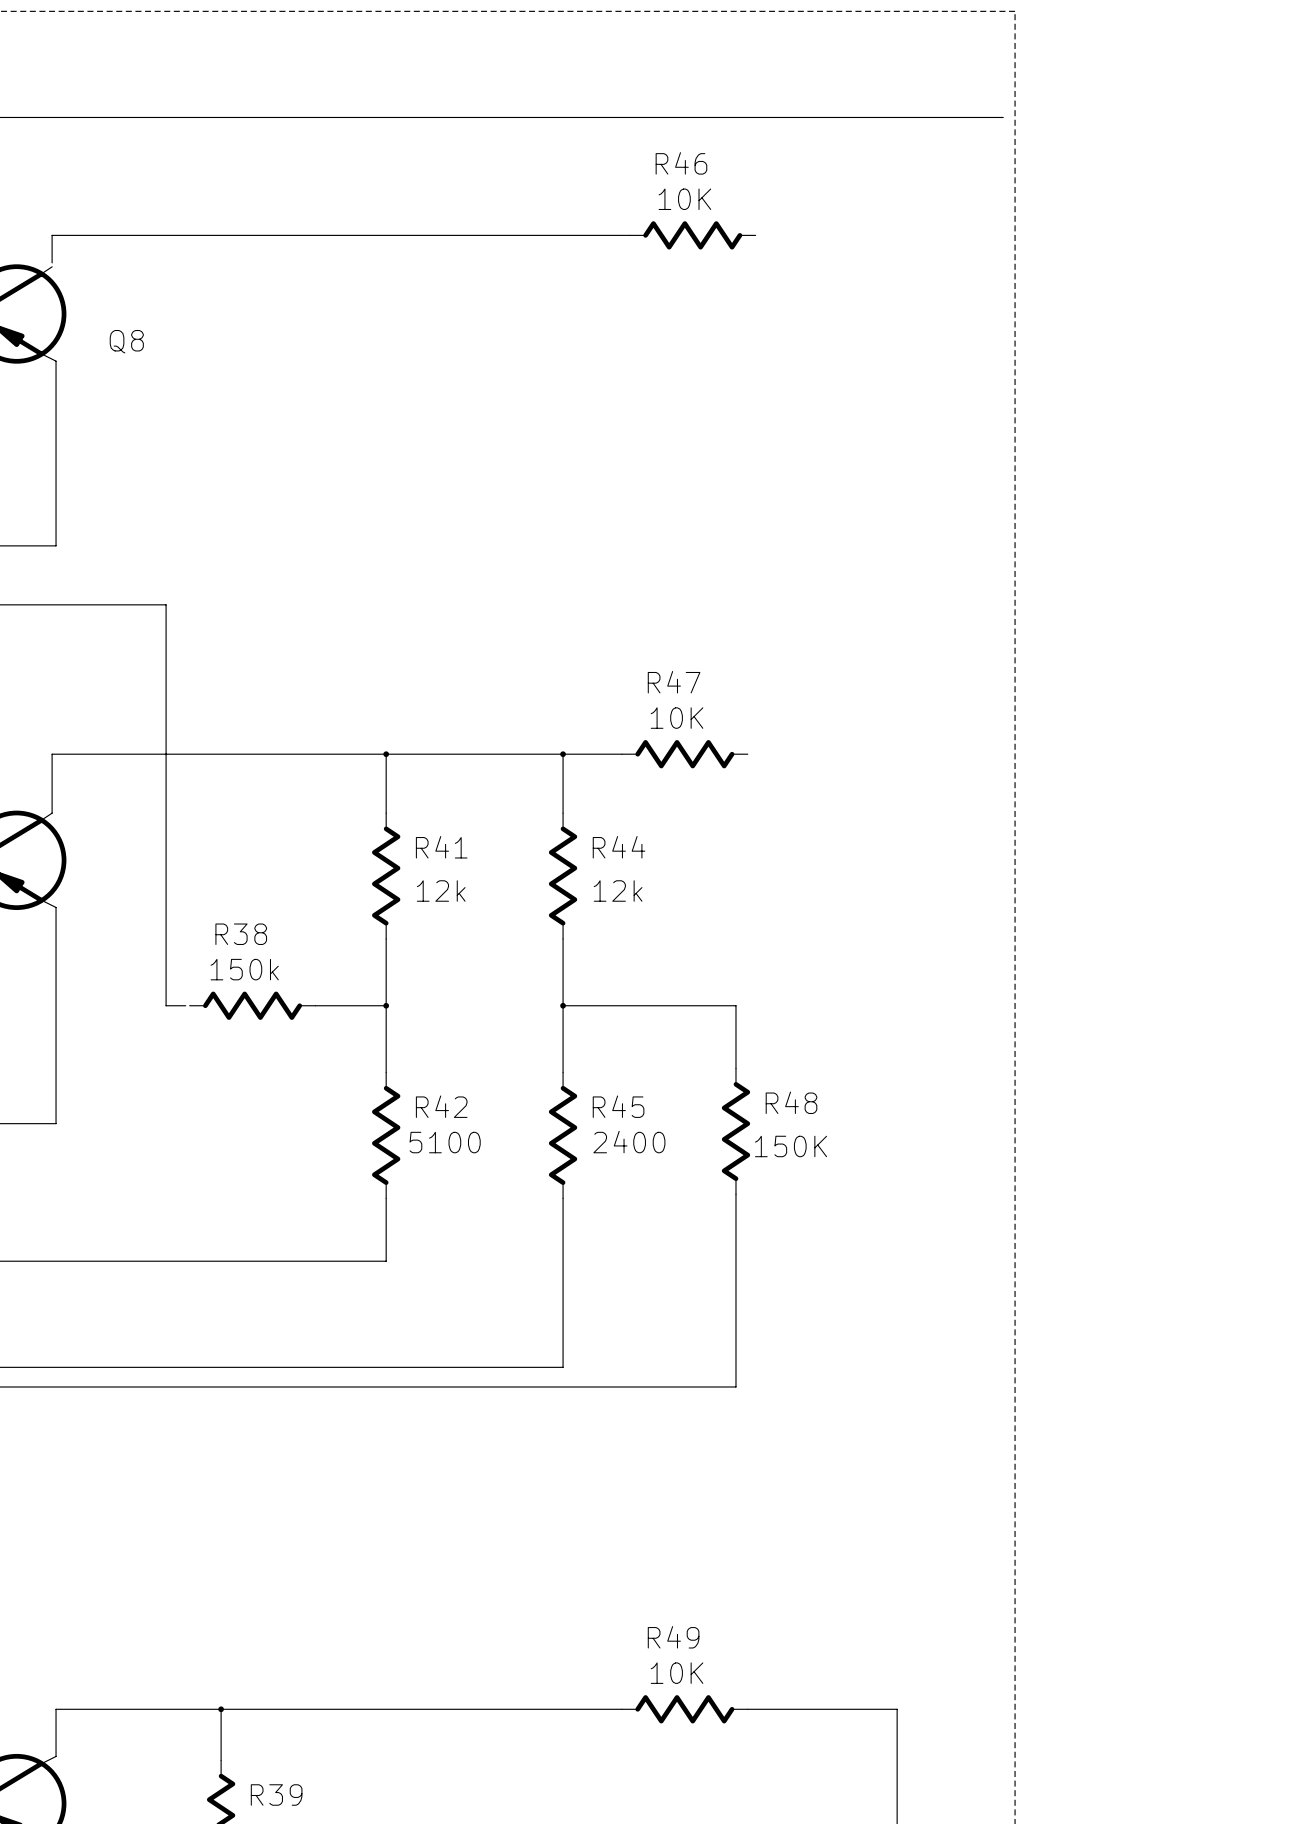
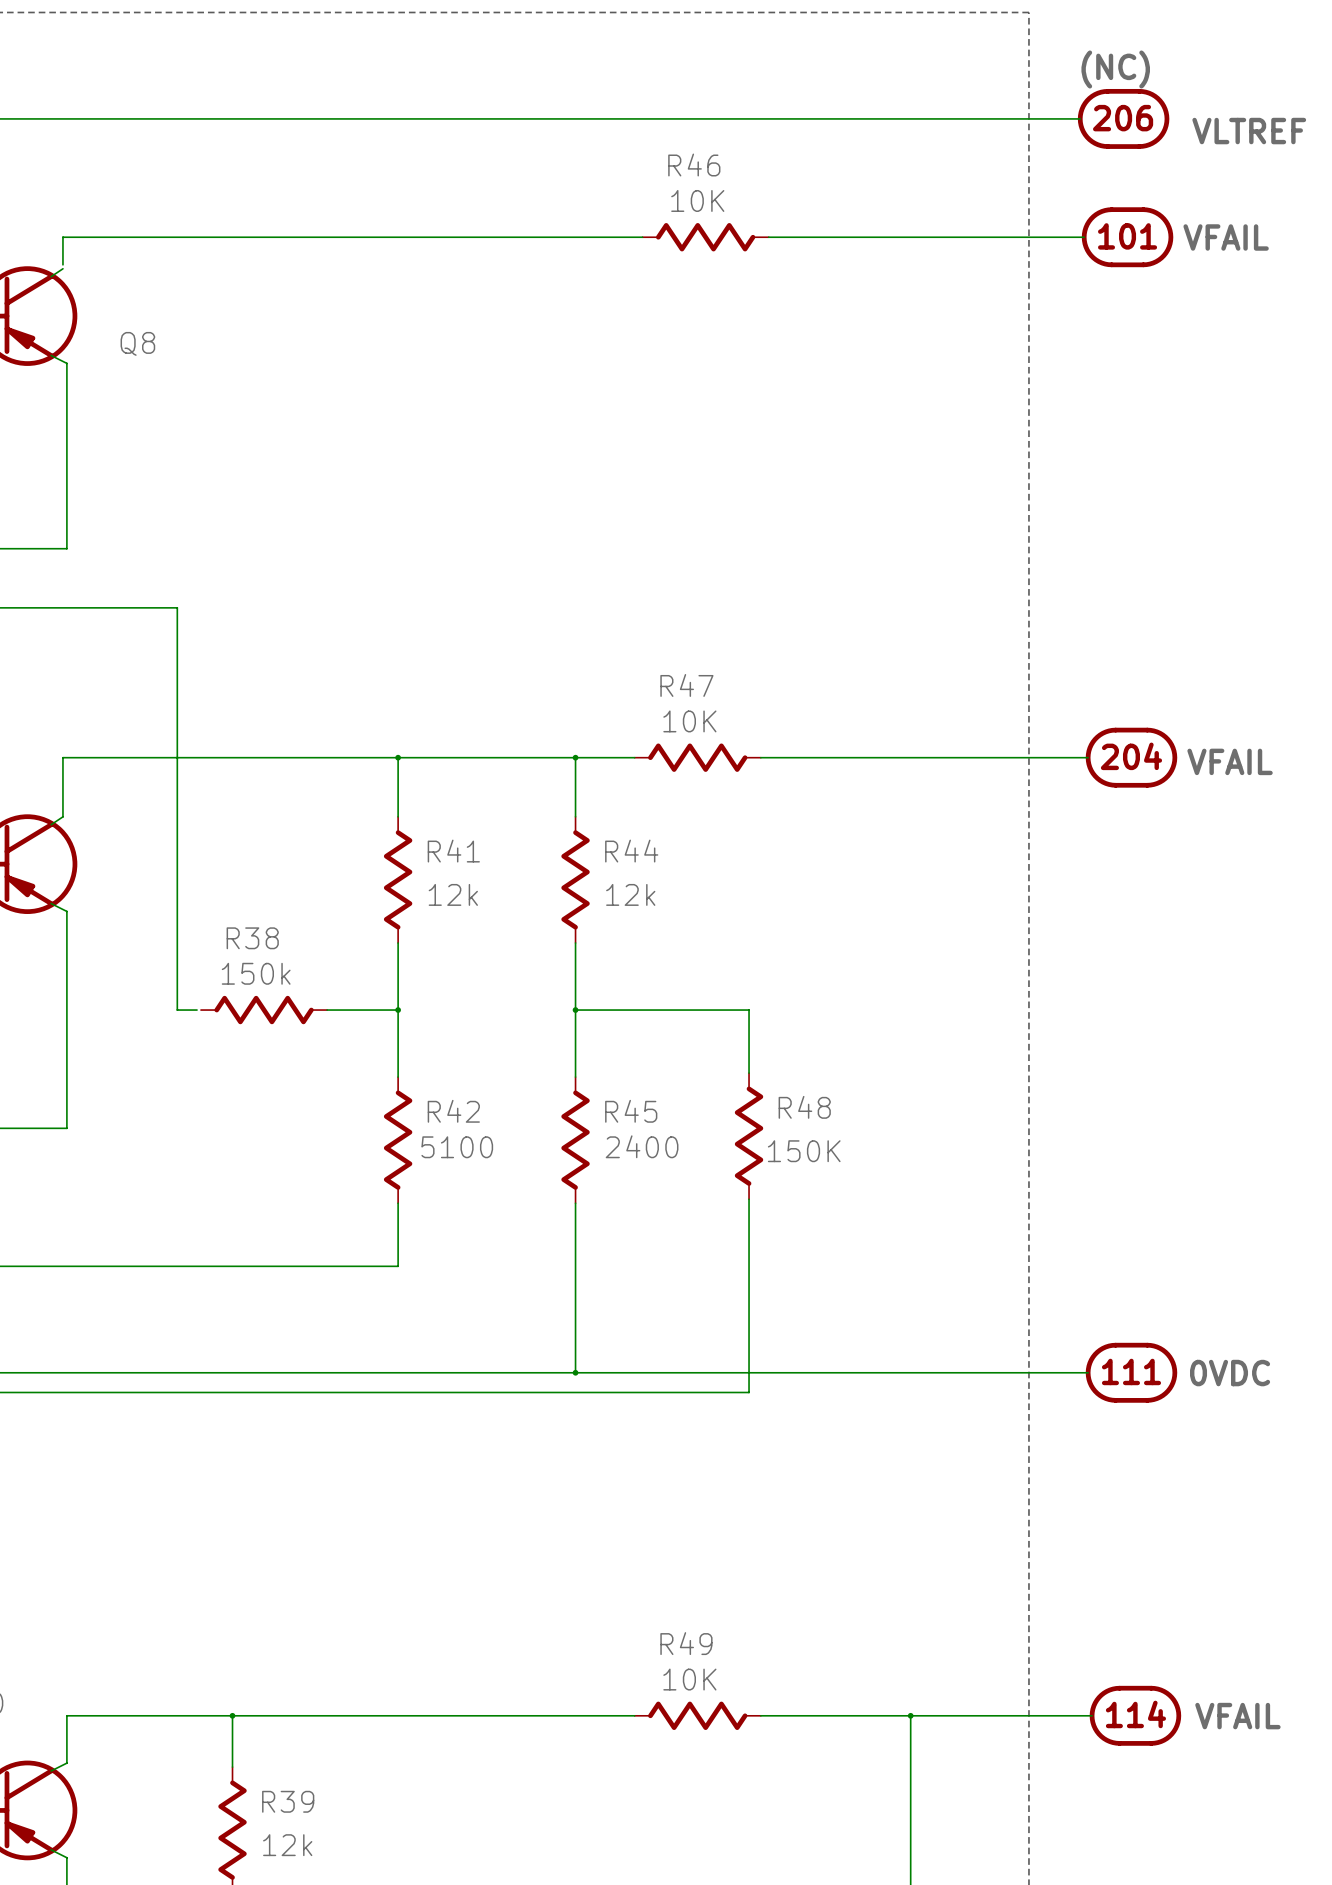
wire: none -> (1017, 118) (1080, 118)
part: none -> (1123, 118)
wire: none -> (768, 237) (1084, 237)
part: none -> (1127, 237)
wire: none -> (760, 757) (1088, 757)
part: none -> (1131, 757)
wire: none -> (575, 1372) (1088, 1372)
junction: none -> (575, 1372)
part: none -> (1131, 1372)
wire: none -> (910, 1715) (1092, 1715)
junction: none -> (910, 1715)
part: none -> (1135, 1715)

